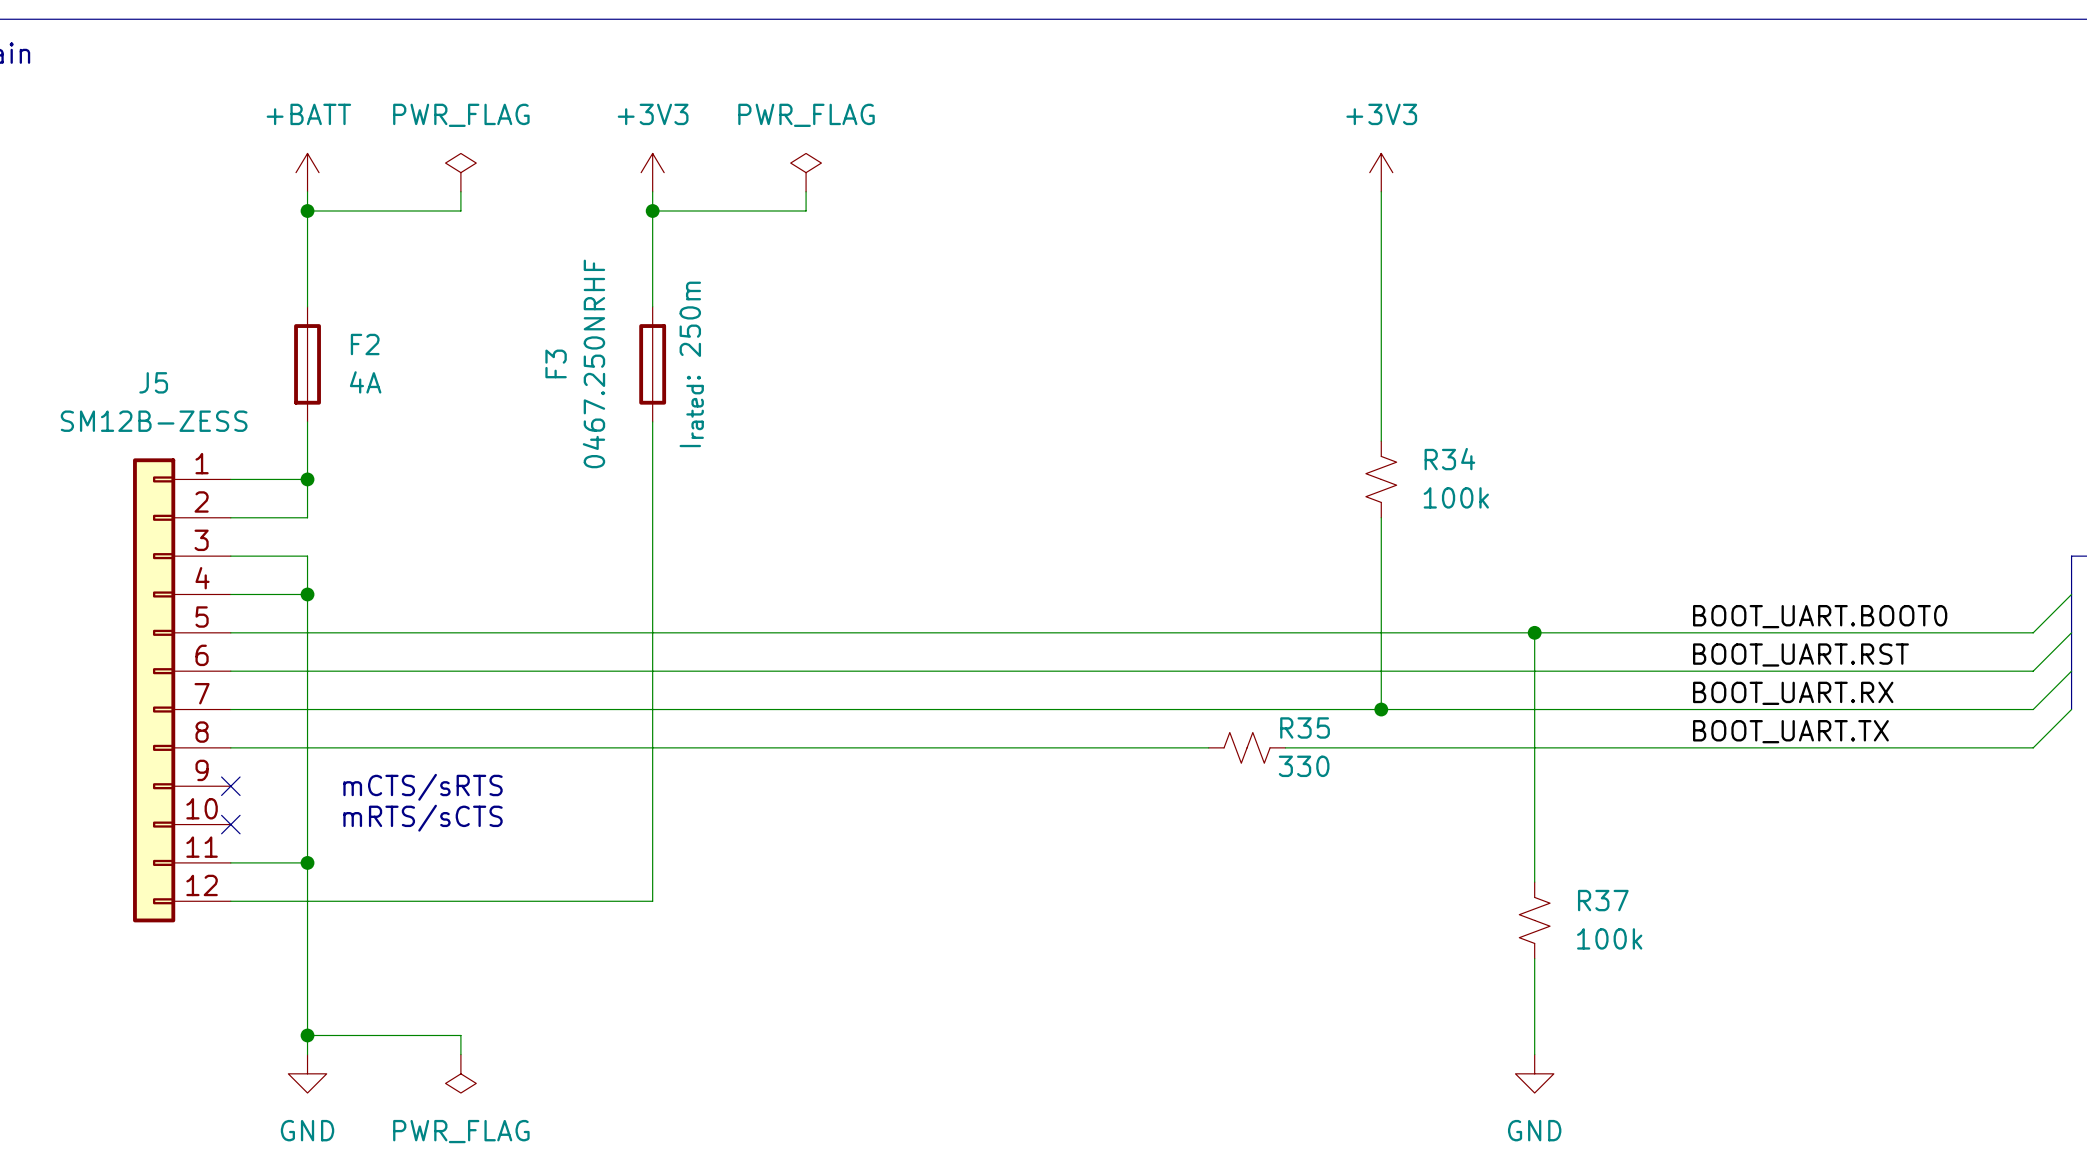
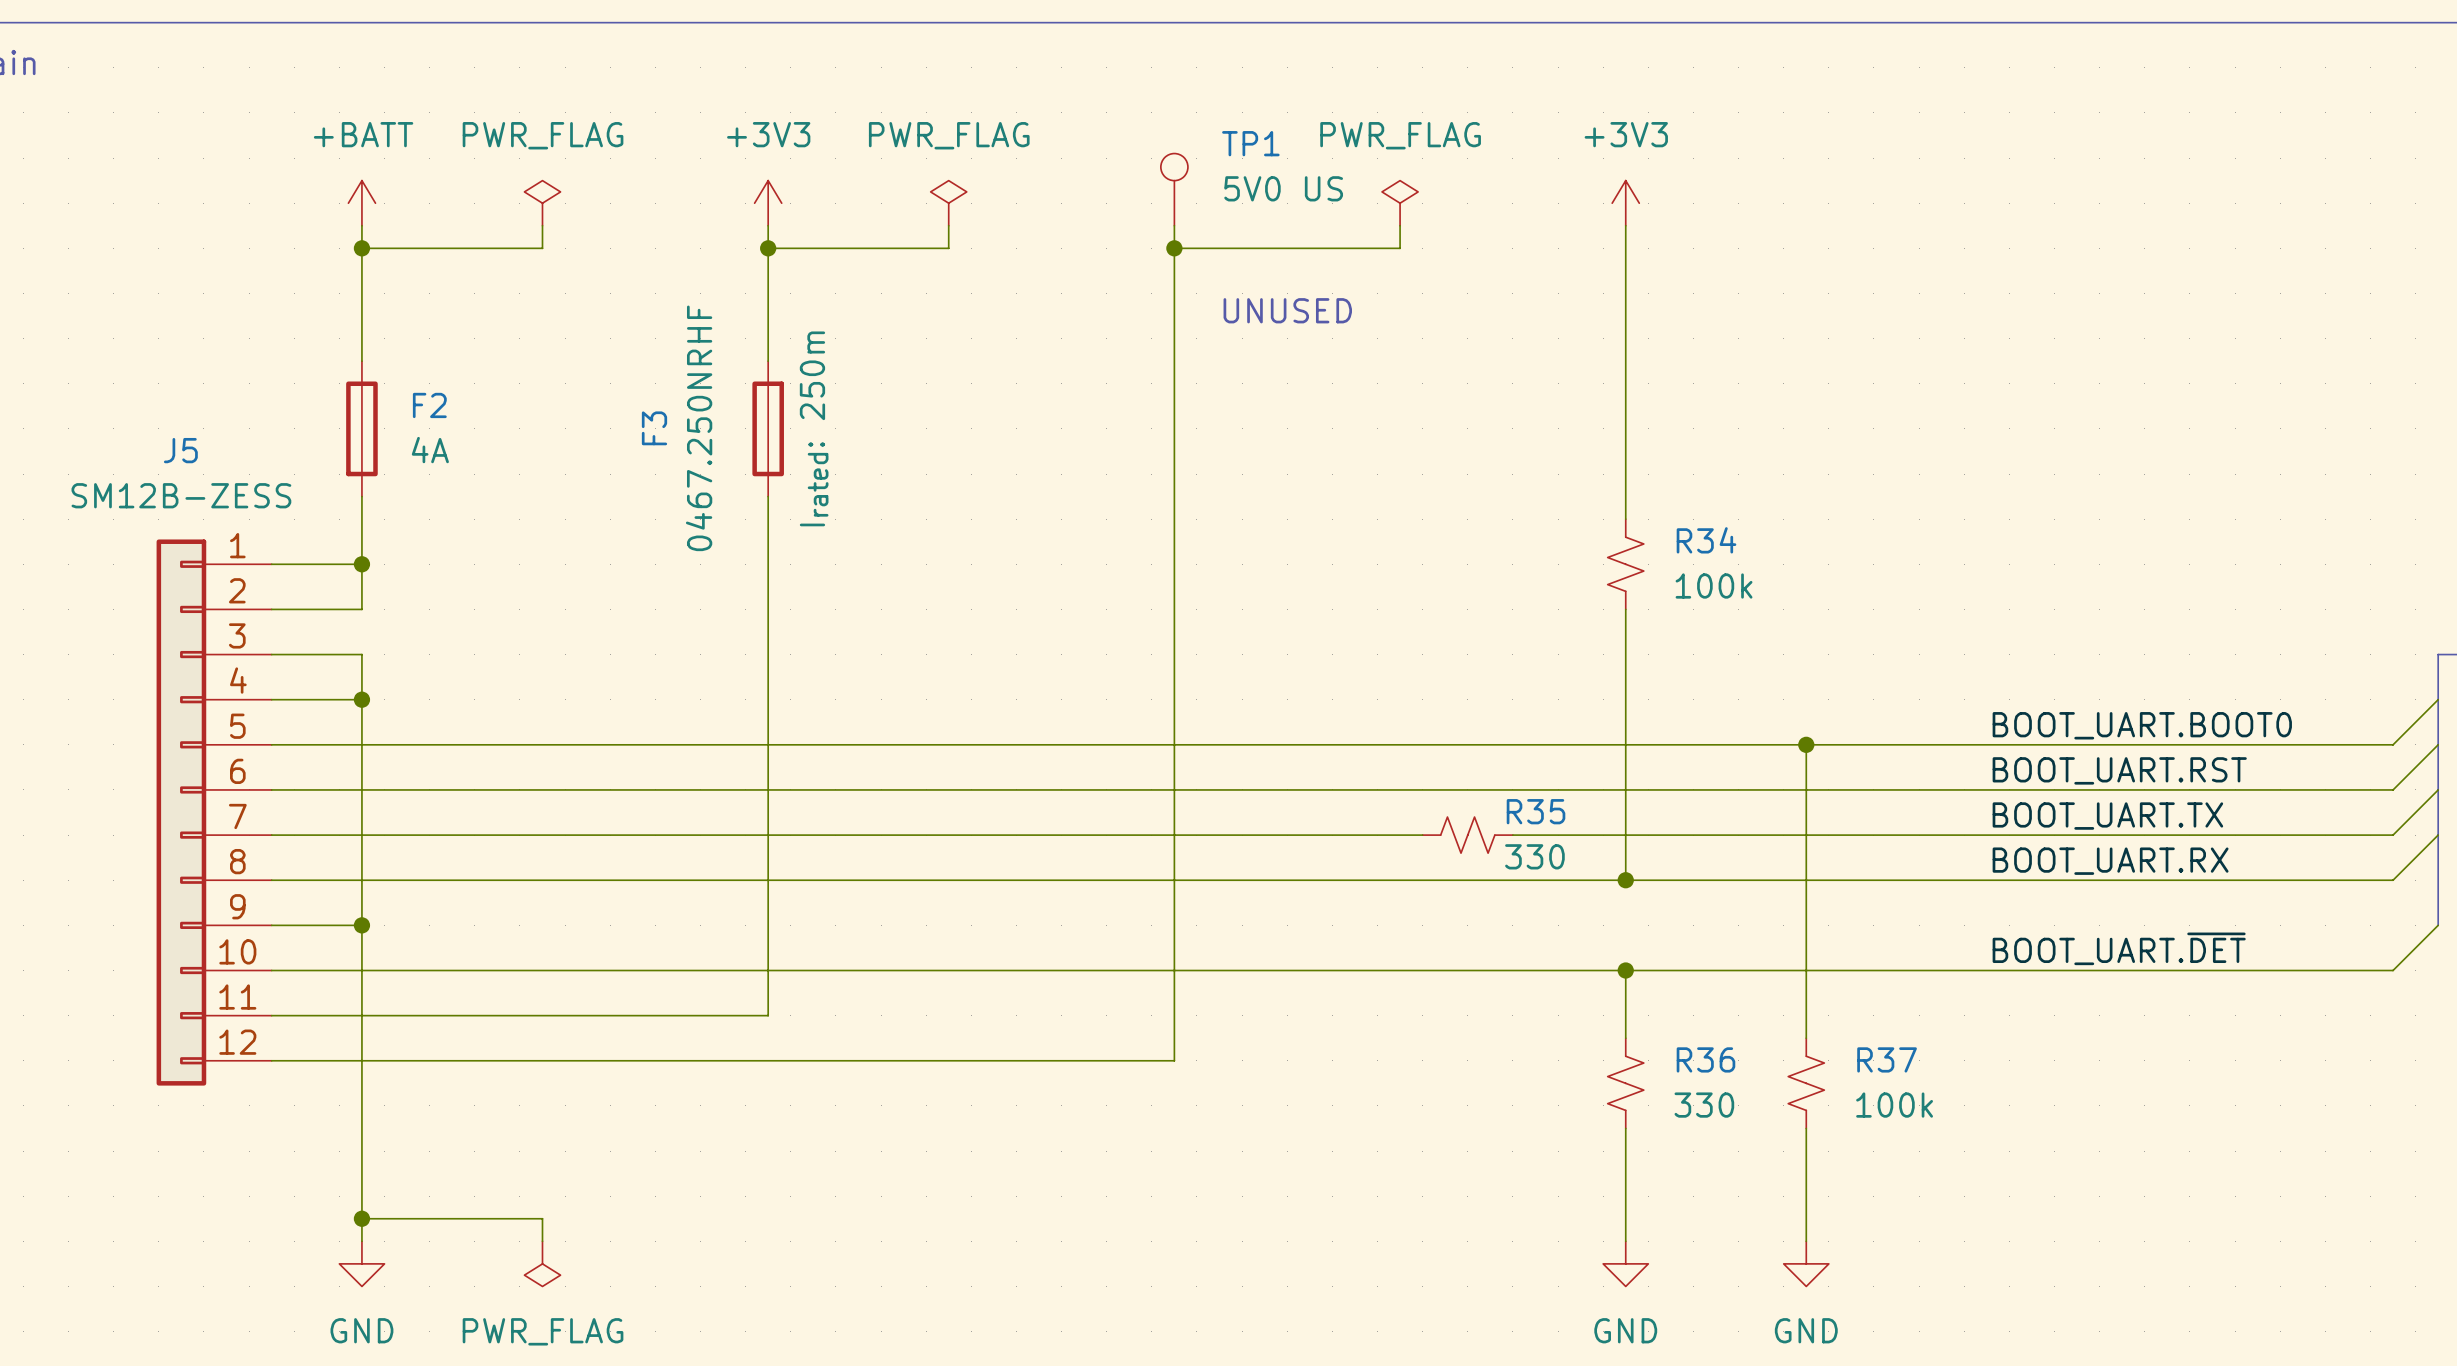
TP1: none -> 5V0 US (1174, 189)
power symbol: none -> PWR_FLAG (1400, 203)
wire: none -> (1174, 225) (1174, 1060) (768, 1060)
wire: none -> (1400, 225) (1400, 248) (1174, 248)
junction: none -> (1174, 248)
text: none -> UNUSED (1287, 310)
label: BOOT_UART.RX (1793, 693) -> BOOT_UART.TX (2107, 816)
wire: (1208, 709) (1285, 709) -> (1422, 880) (1512, 880)
wire: none -> (1625, 835) (1625, 880)
junction position: (1381, 709) -> (1625, 880)
bus: none -> (2438, 835) (2438, 925)
label: BOOT_UART.TX (1790, 731) -> BOOT_UART.RX (2110, 861)
R35 position: (1247, 747) -> (1467, 835)
wire: none -> (271, 925) (361, 925)
no-connect mark: (230, 786) -> none
wire: none -> (2438, 925) (2393, 970) (271, 970)
text: mCTS/sRTS (423, 787) -> none
label: none -> BOOT_UART.~{DET} (2119, 948)
text: mRTS/sCTS (423, 818) -> none
no-connect mark: (230, 824) -> none
wire: none -> (1625, 970) (1625, 1038)
junction: none -> (1625, 970)
junction position: (307, 862) -> (361, 925)
wire: (652, 862) (652, 901) -> (768, 1015) (361, 1015)
R36: none -> 330 (1625, 1083)
wire: none -> (1625, 1128) (1625, 1241)
power symbol: none -> GND (1625, 1263)

